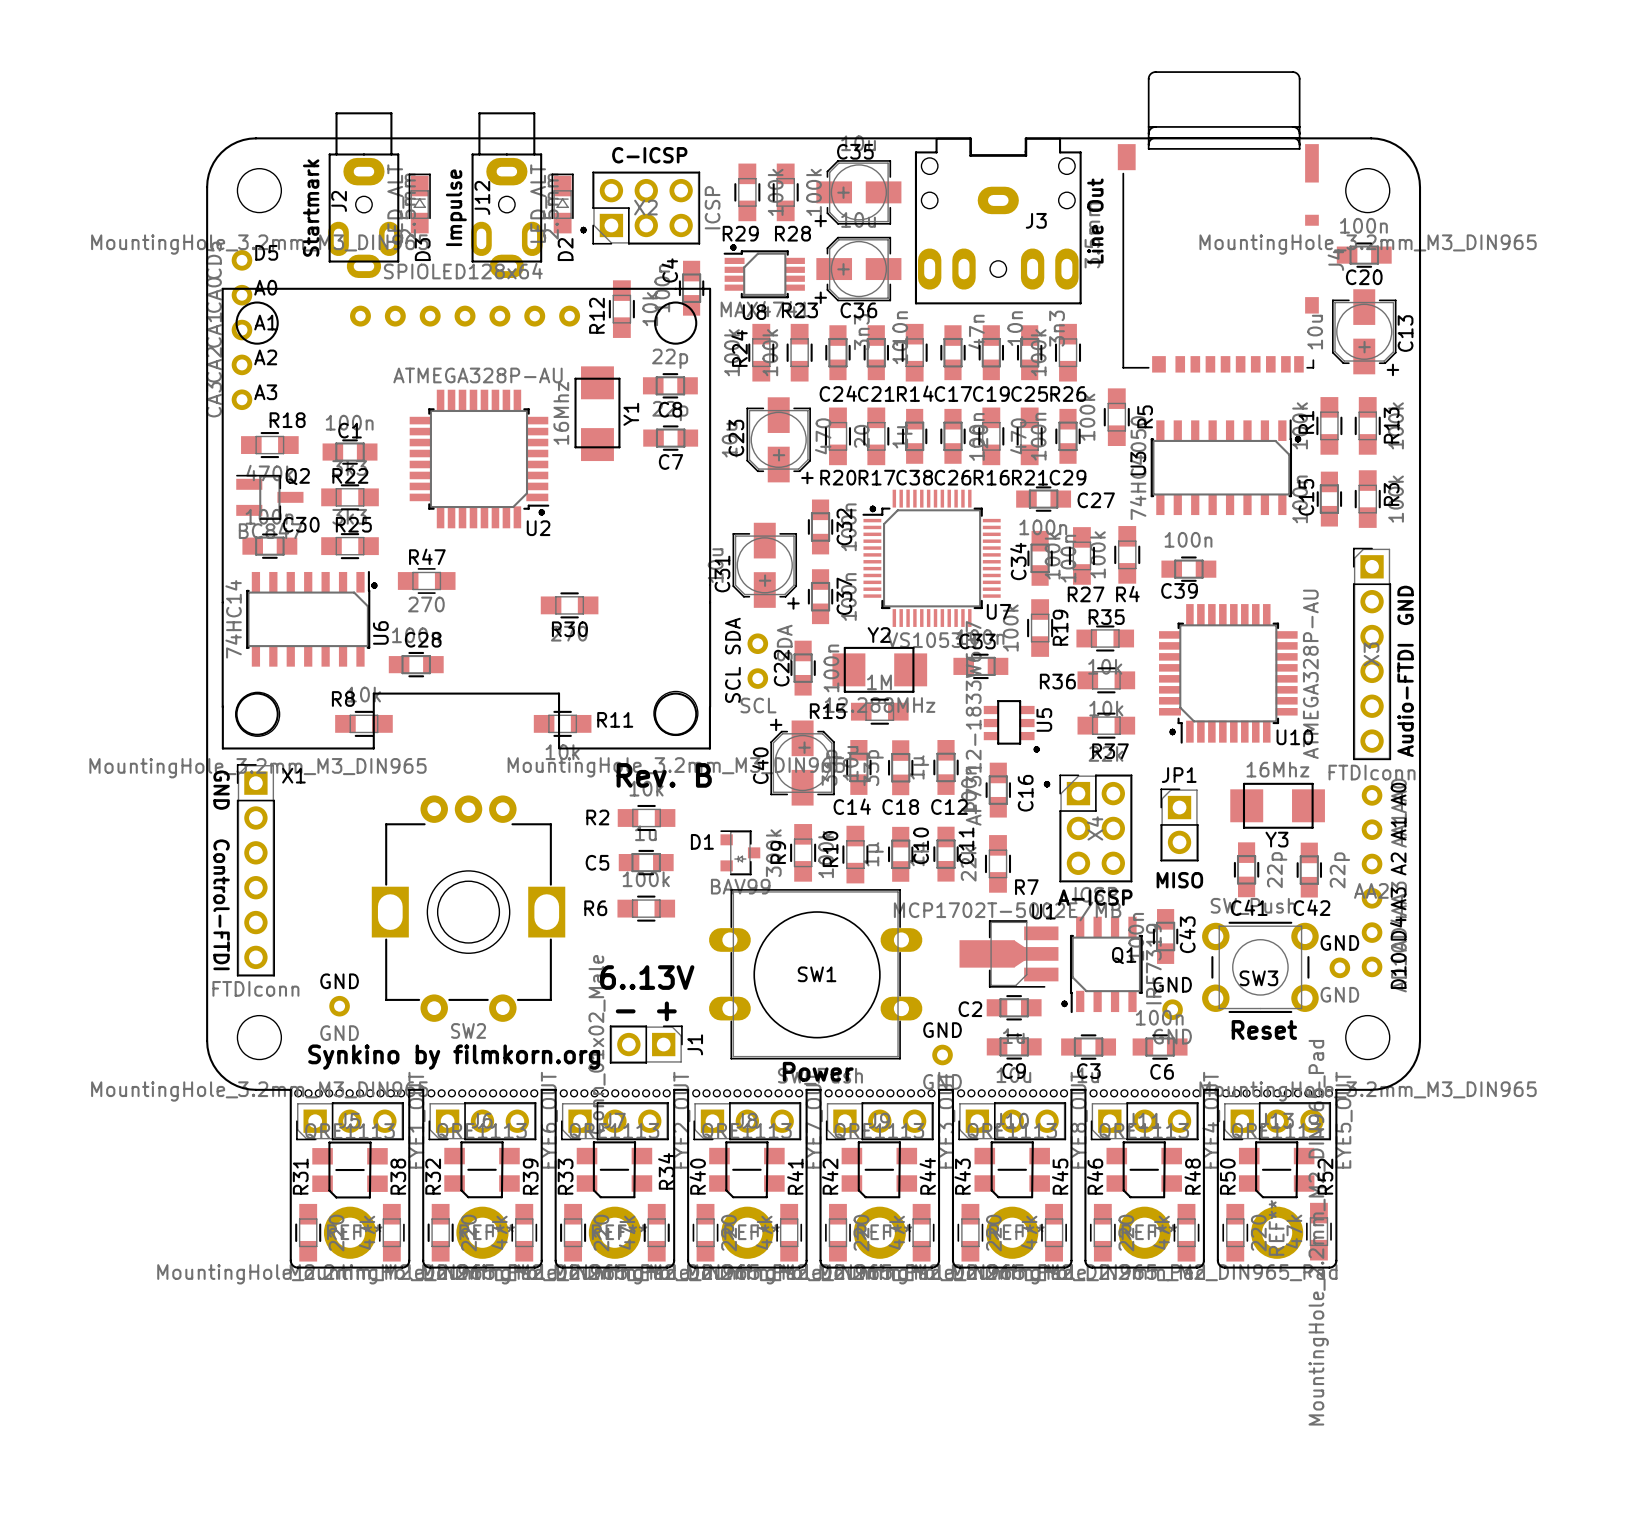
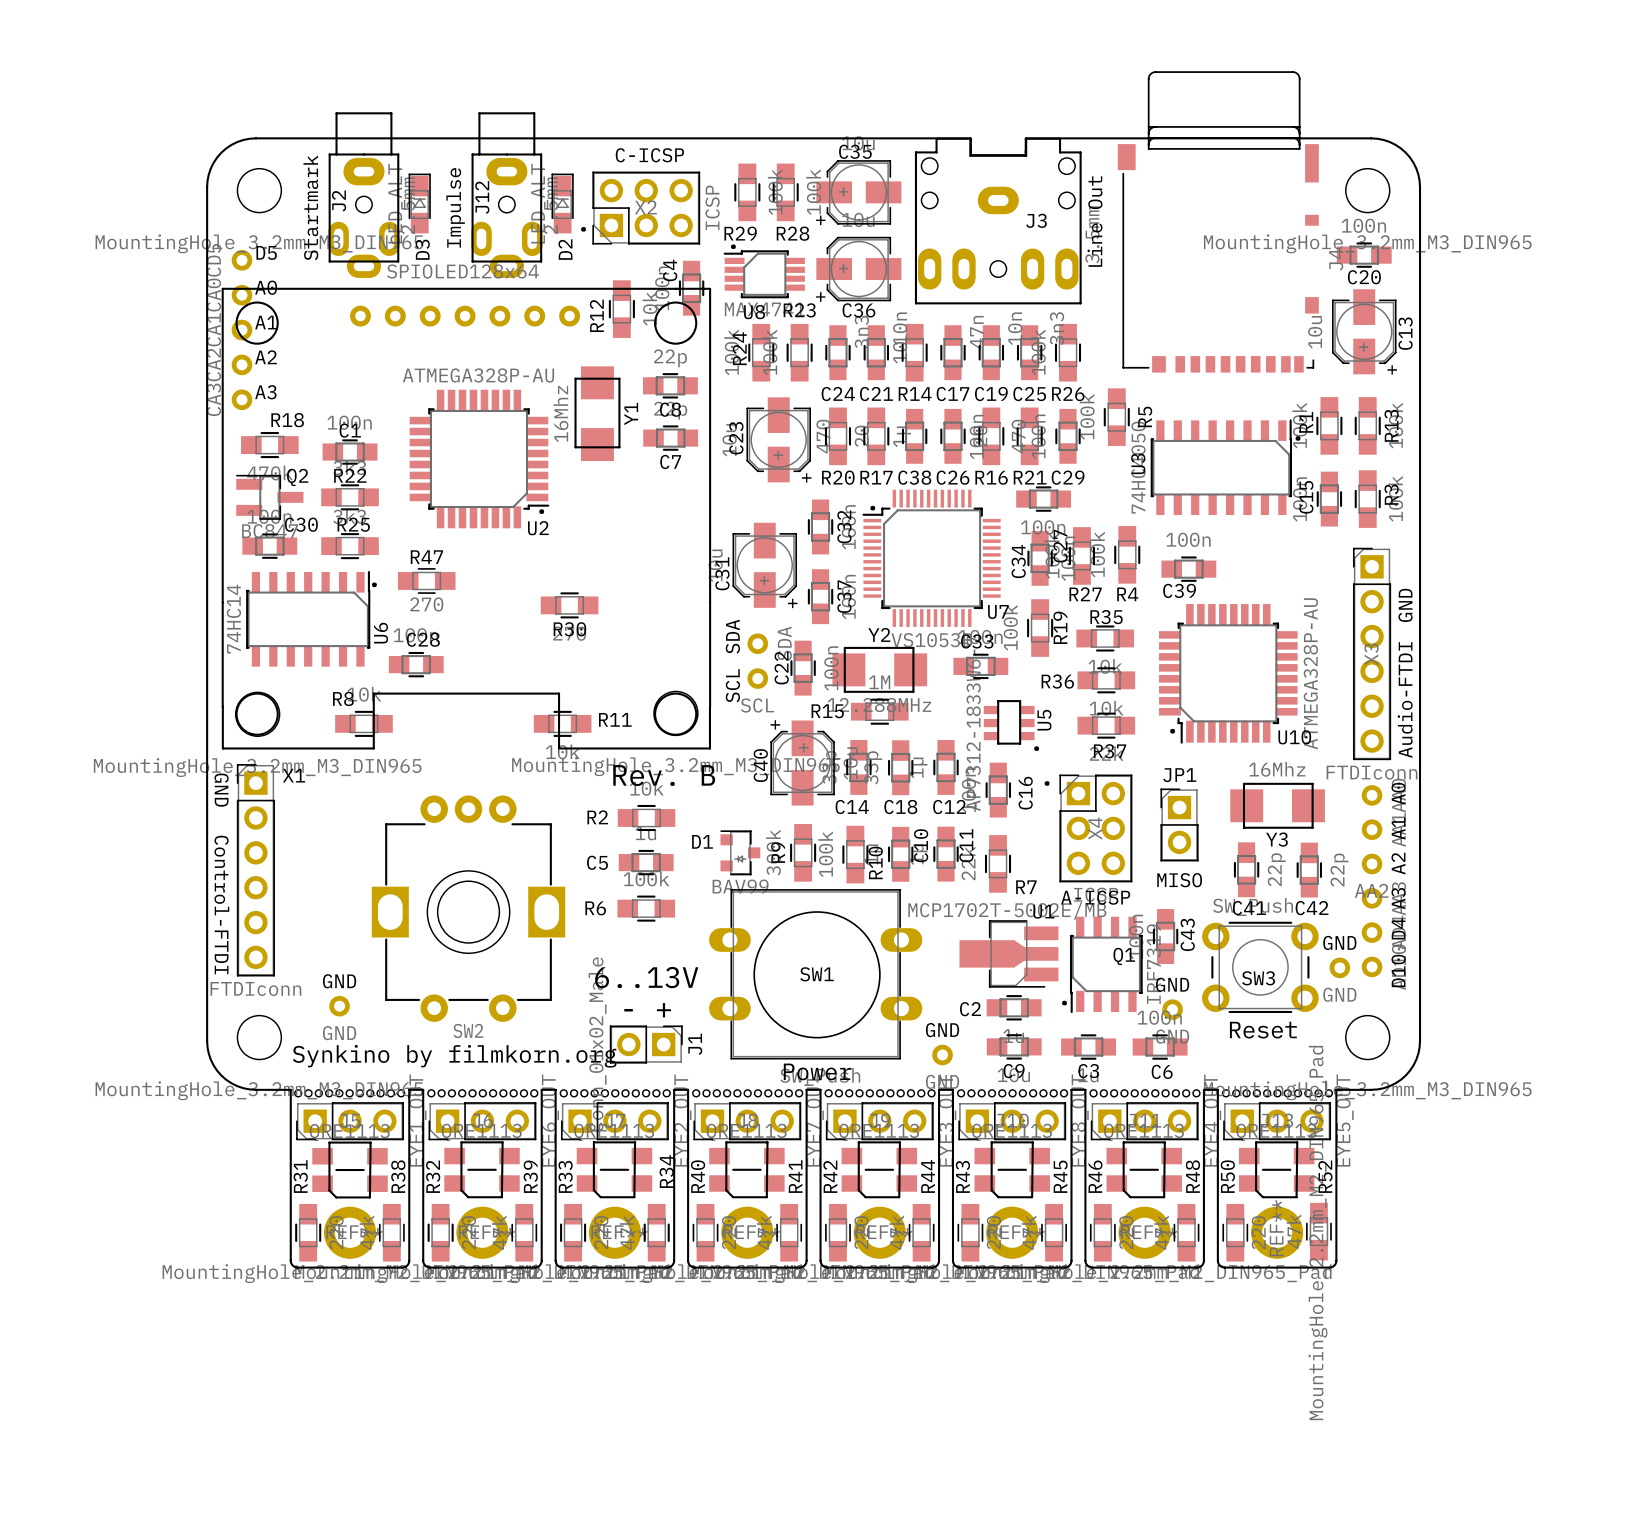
C27 name rotation: 0° (1096, 500) -> 90° counterclockwise (1060, 546)
C27 name position: C27 (1096, 500) -> C27 (1060, 546)
R10 name position: R10 (830, 849) -> R10 (875, 862)

